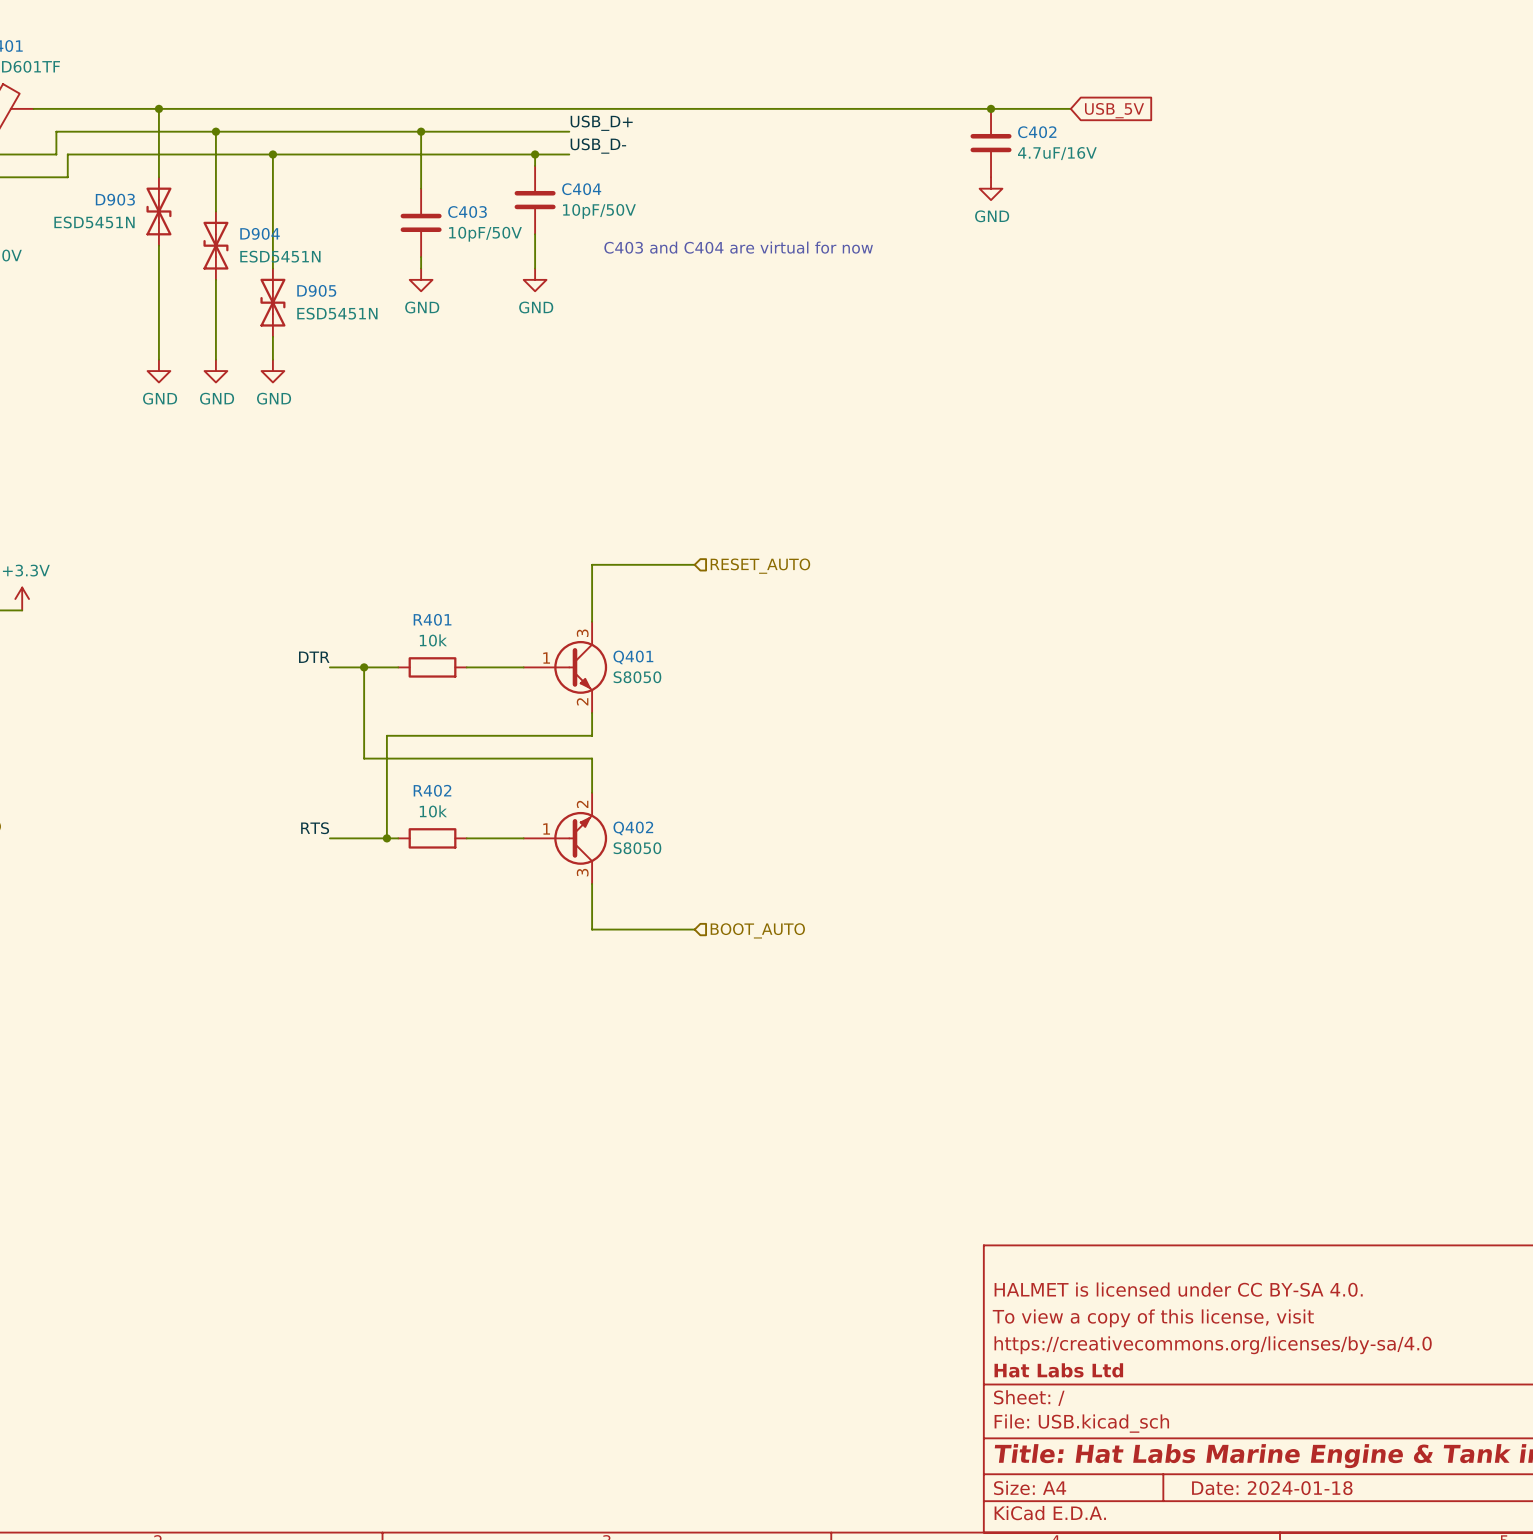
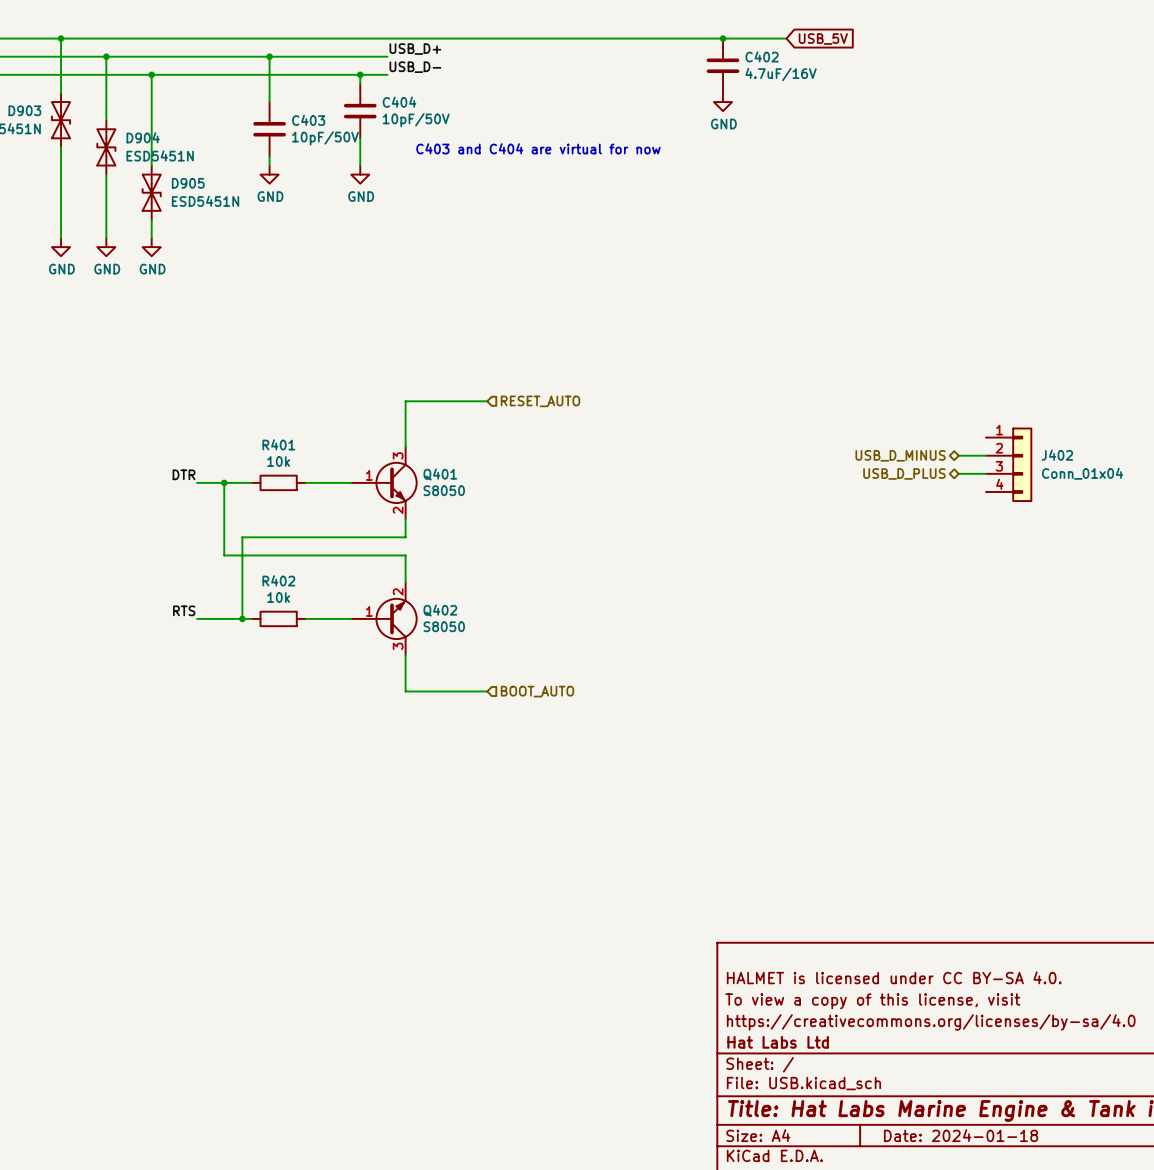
wire: none -> (958, 455) (985, 455)
hierarchical label: none -> USB_D_MINUS (900, 455)
J402: none -> Conn_01x04 (1009, 464)
wire: none -> (958, 473) (985, 473)
hierarchical label: none -> USB_D_PLUS (904, 473)

